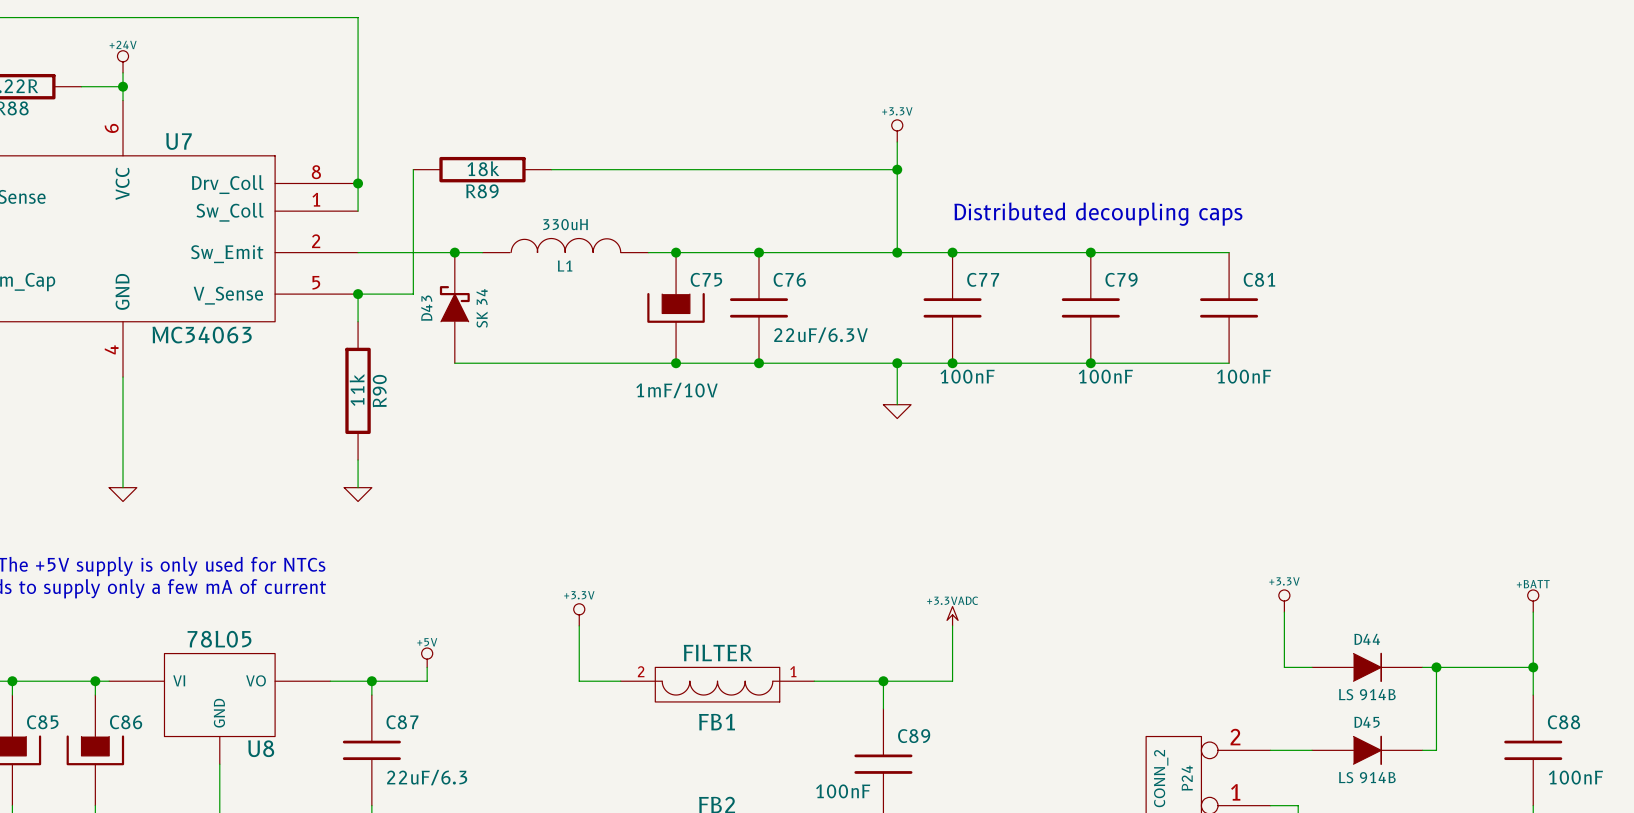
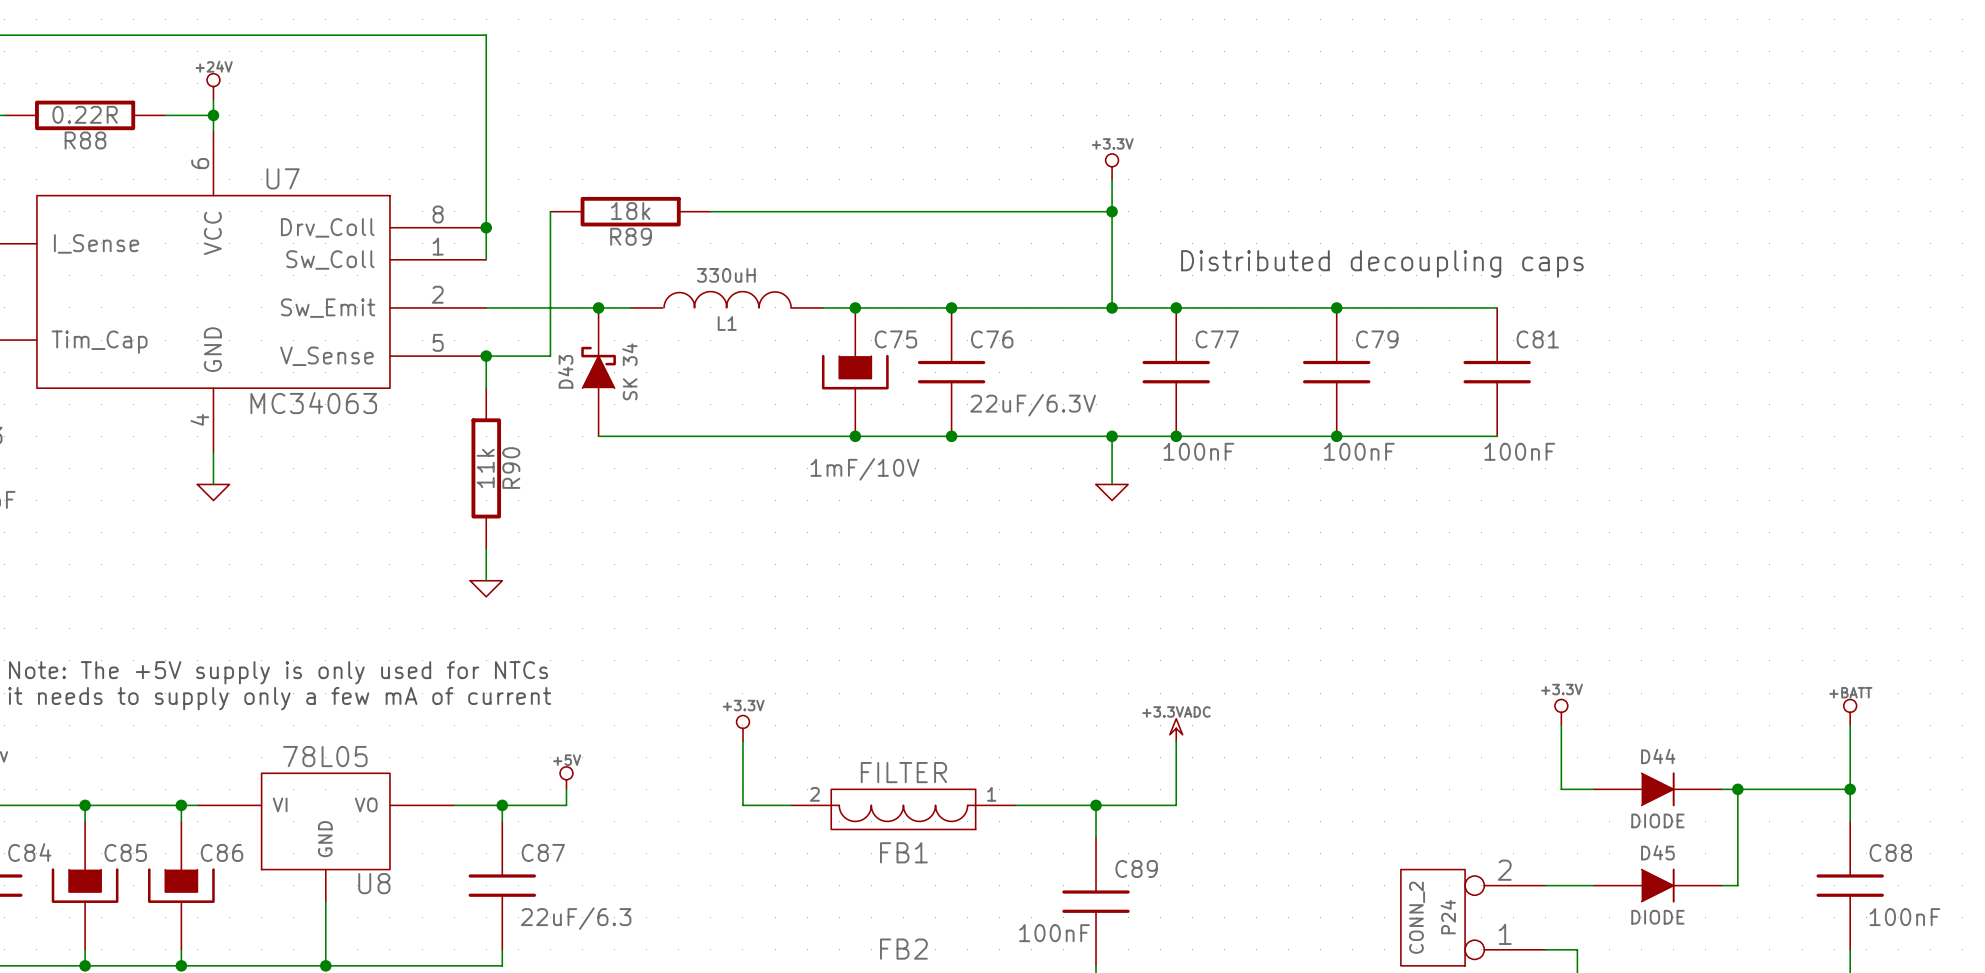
wire: (123, 404) (123, 487) -> none
power symbol position: (123, 494) -> (213, 492)
D44 value: LS 914B (1367, 694) -> DIODE (1657, 820)
D45 value: LS 914B (1367, 777) -> DIODE (1657, 917)

